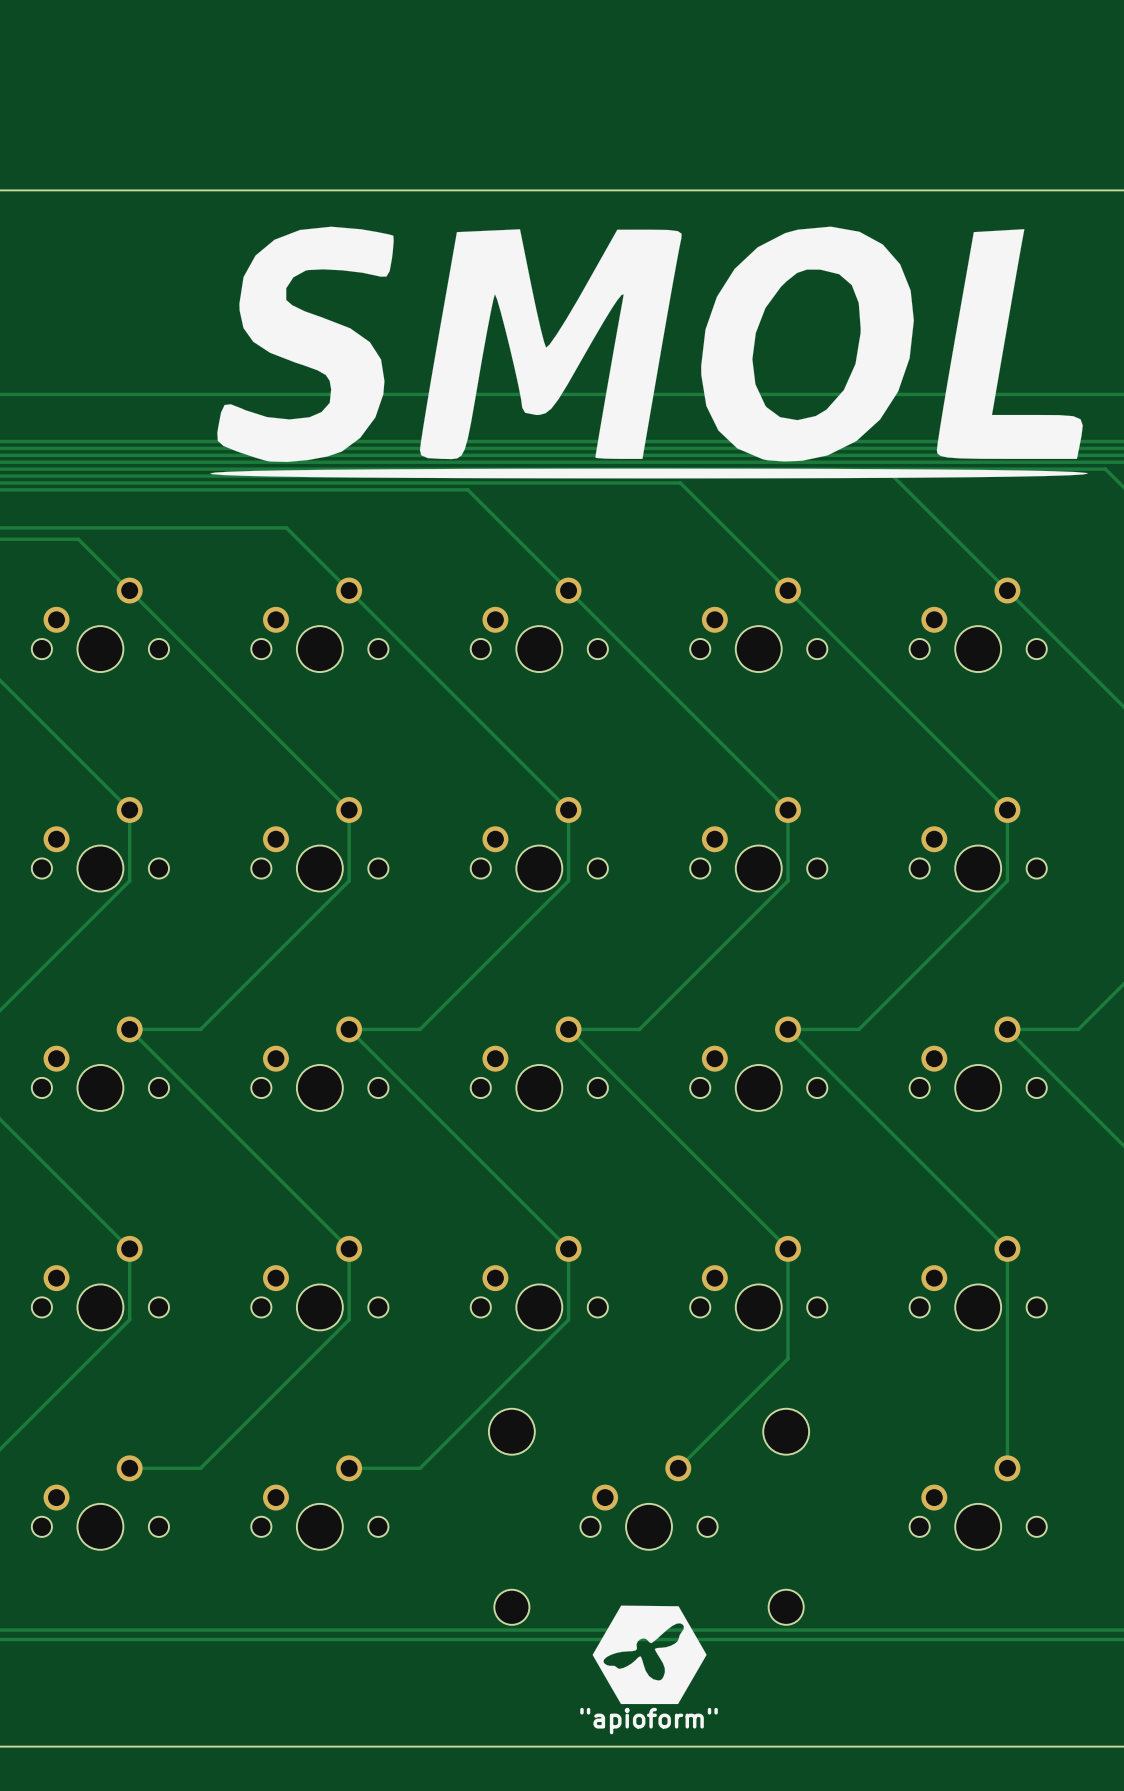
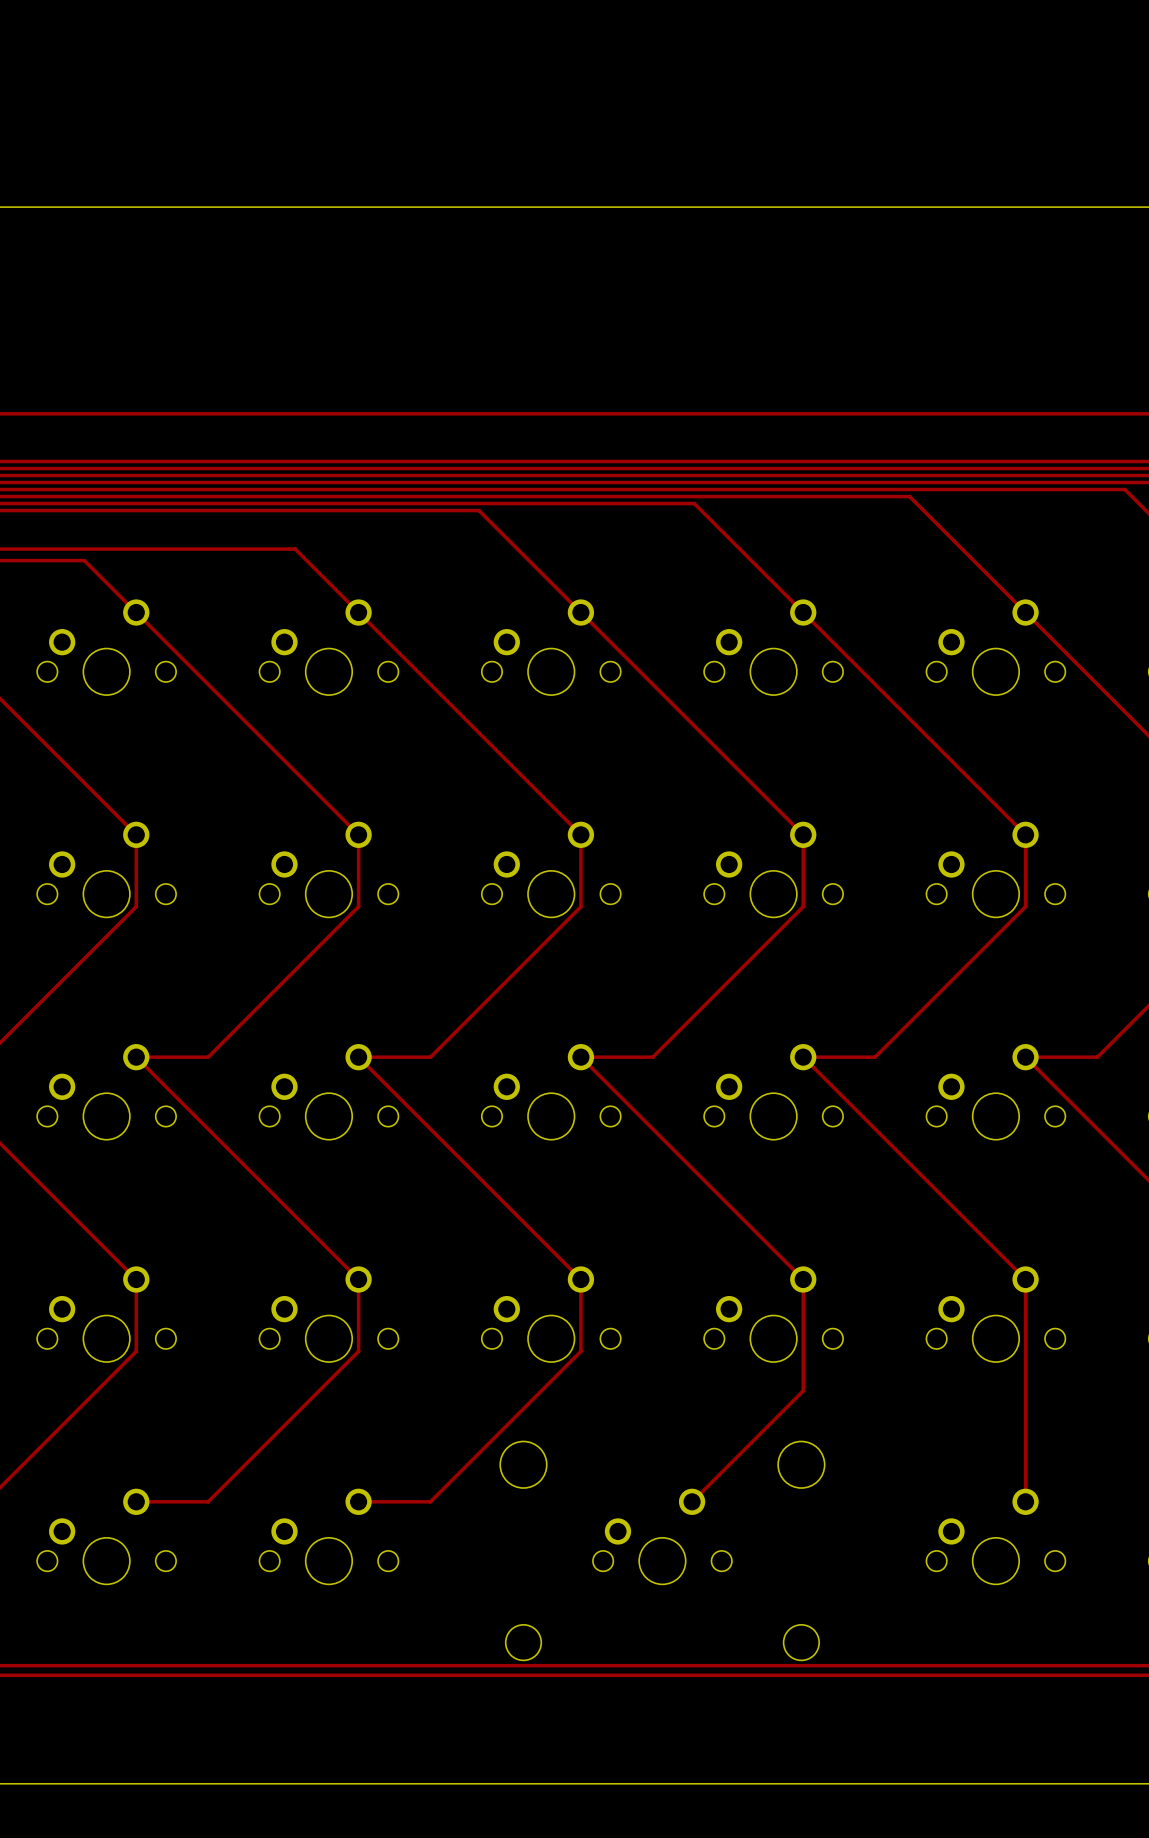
drawing: [210, 226, 1088, 479] -> none
drawing: [592, 1605, 707, 1705] -> none
text: "apioform" (649, 1721) -> none

